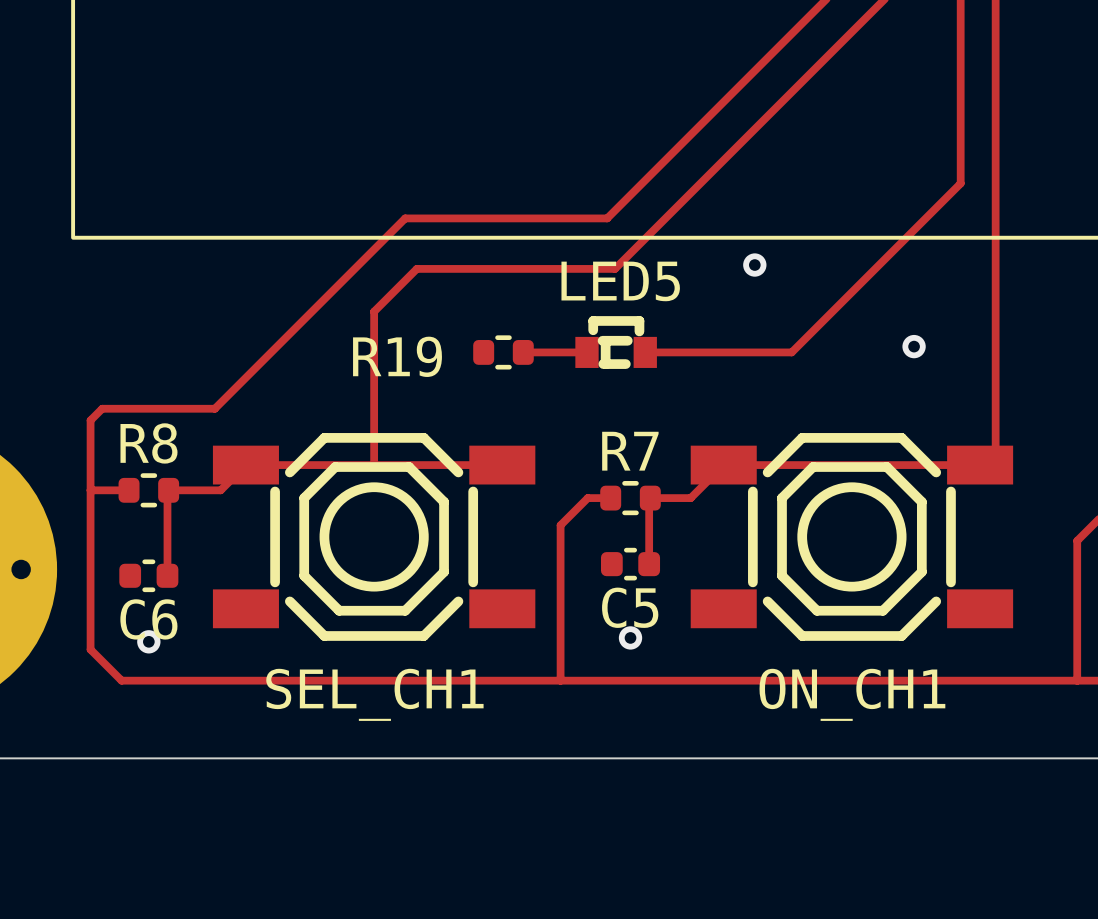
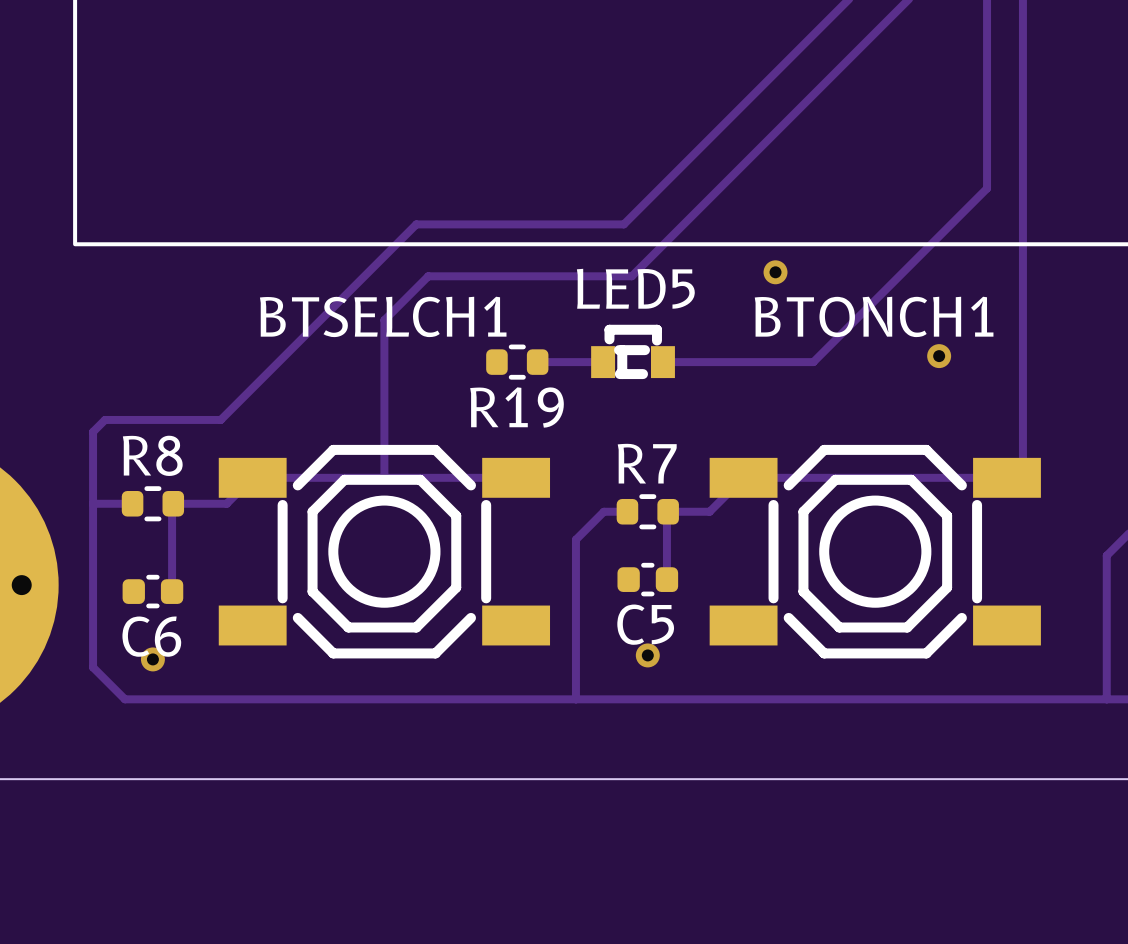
R19 name position: R19 (397, 356) -> R19 (516, 407)
SEL_CH1 name: SEL_CH1 (374, 694) -> BTSELCH1 (383, 316)
ON_CH1 name: ON_CH1 (852, 694) -> BTONCH1 (874, 316)

